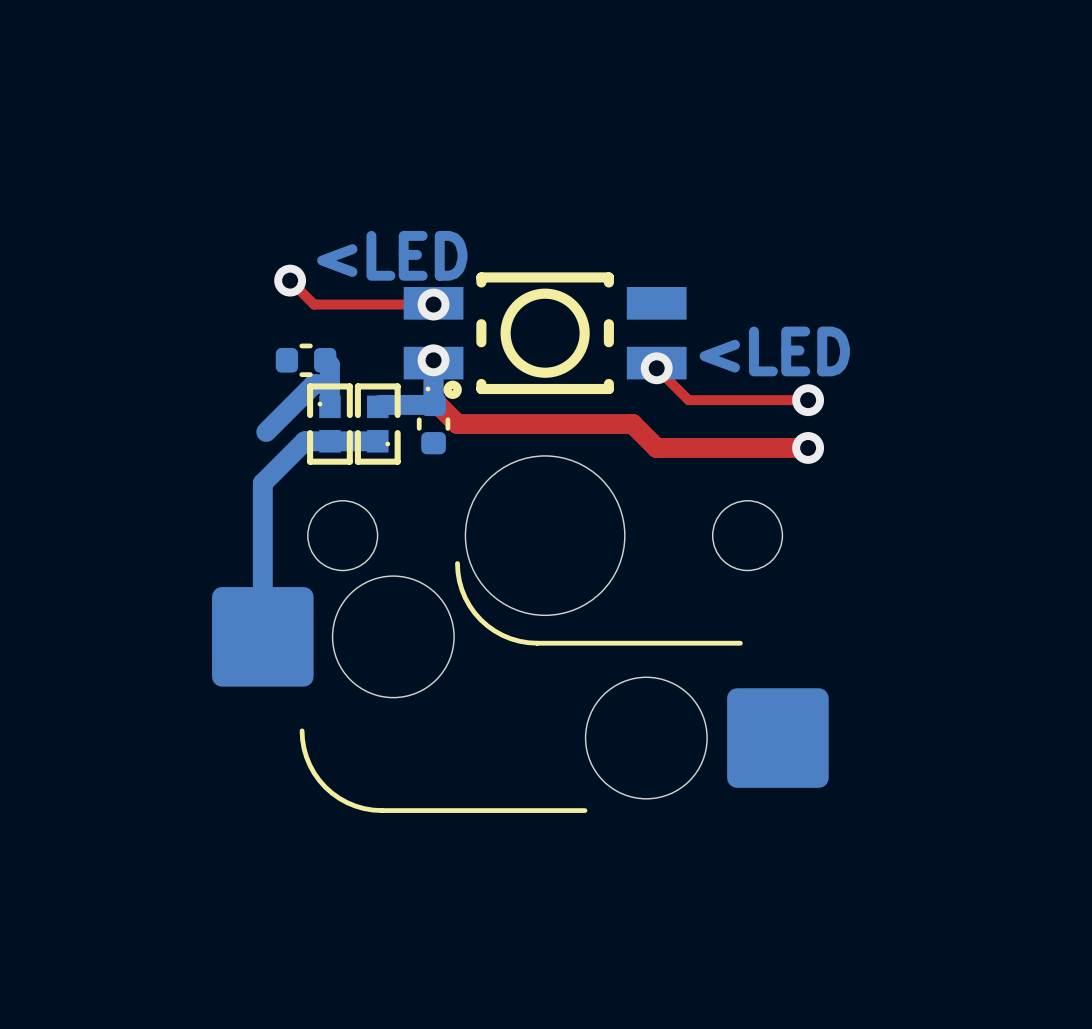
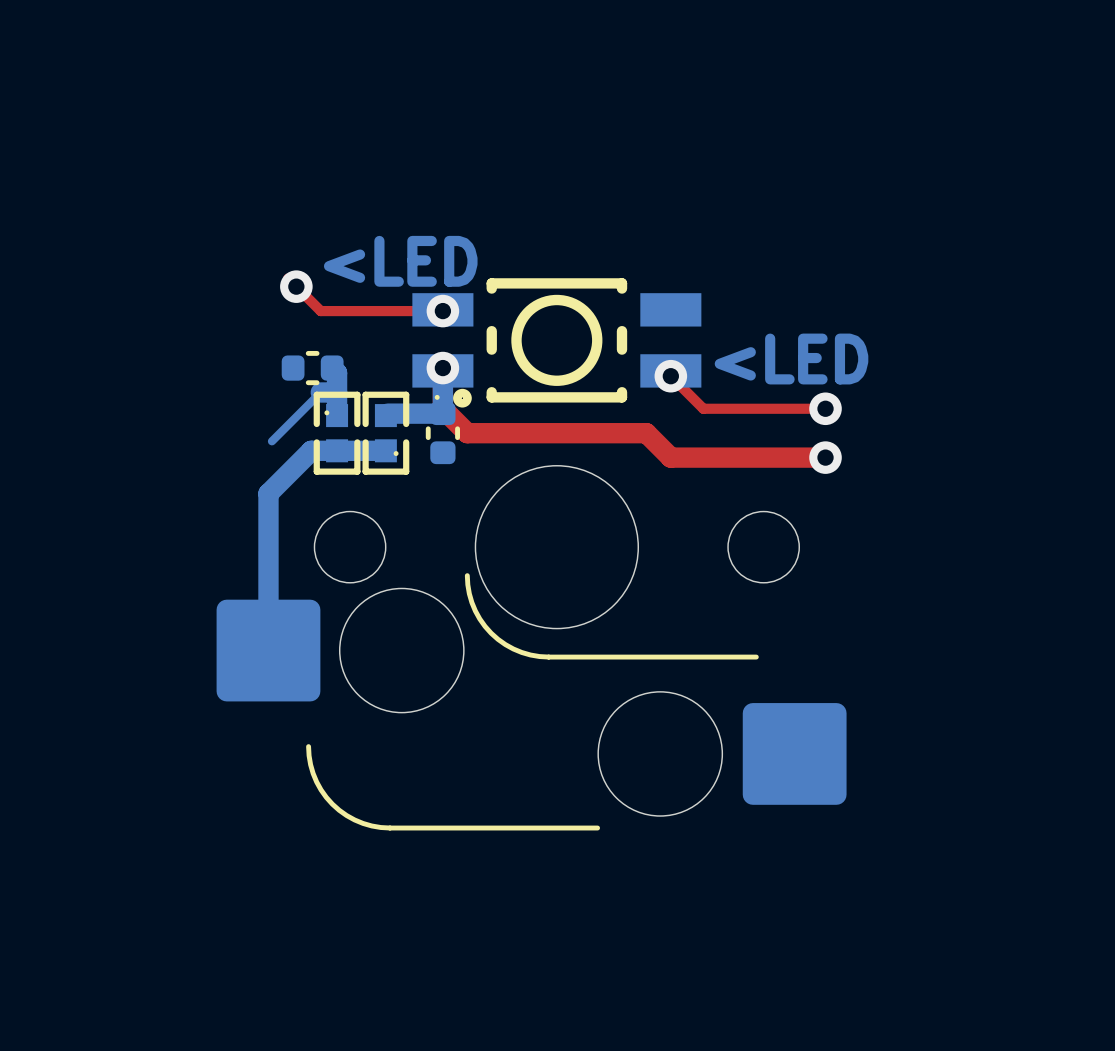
bottom track width: thick (314, 384) (266, 432) -> thin (320, 392) (271, 441)

